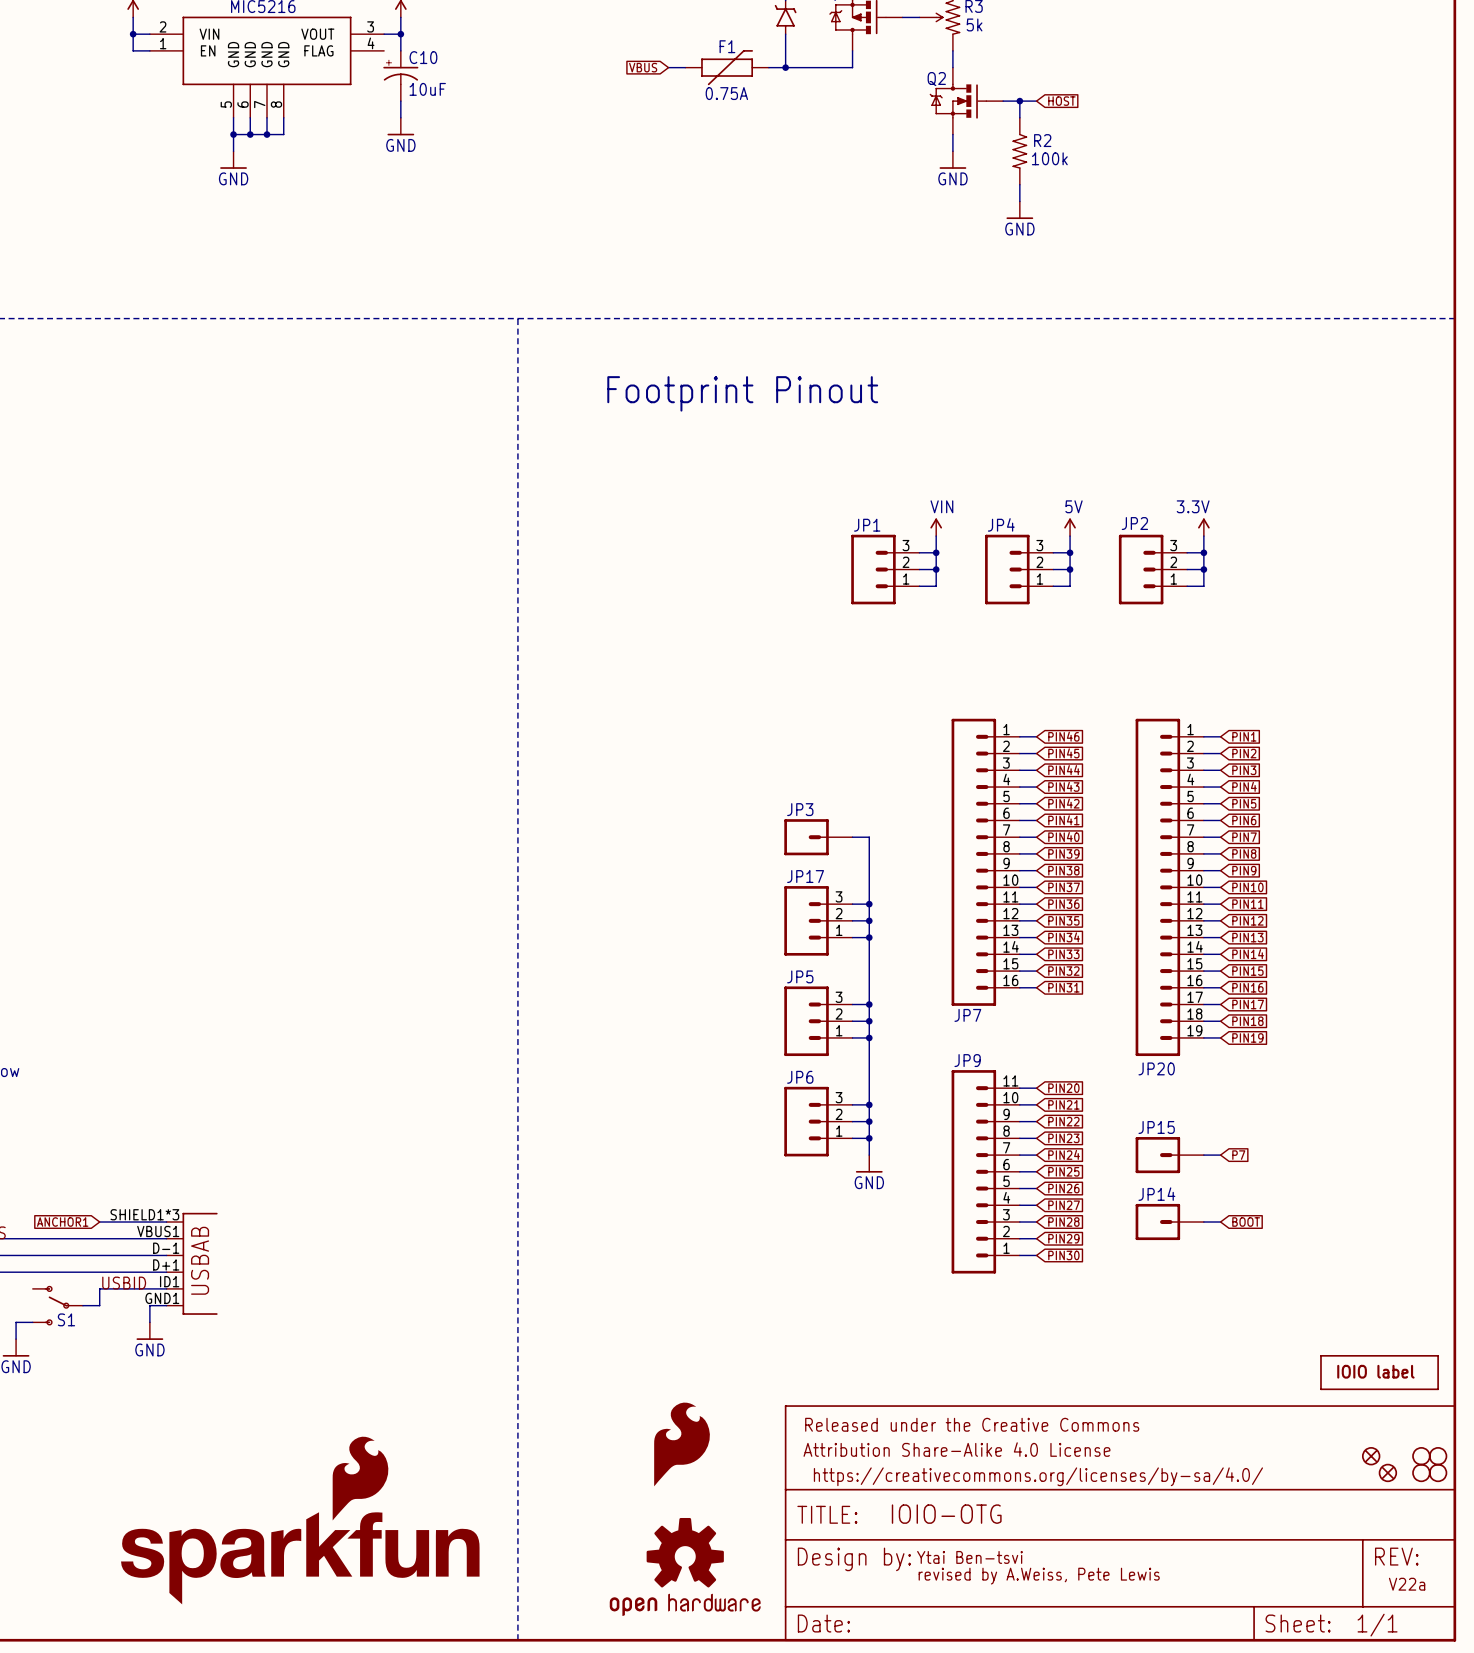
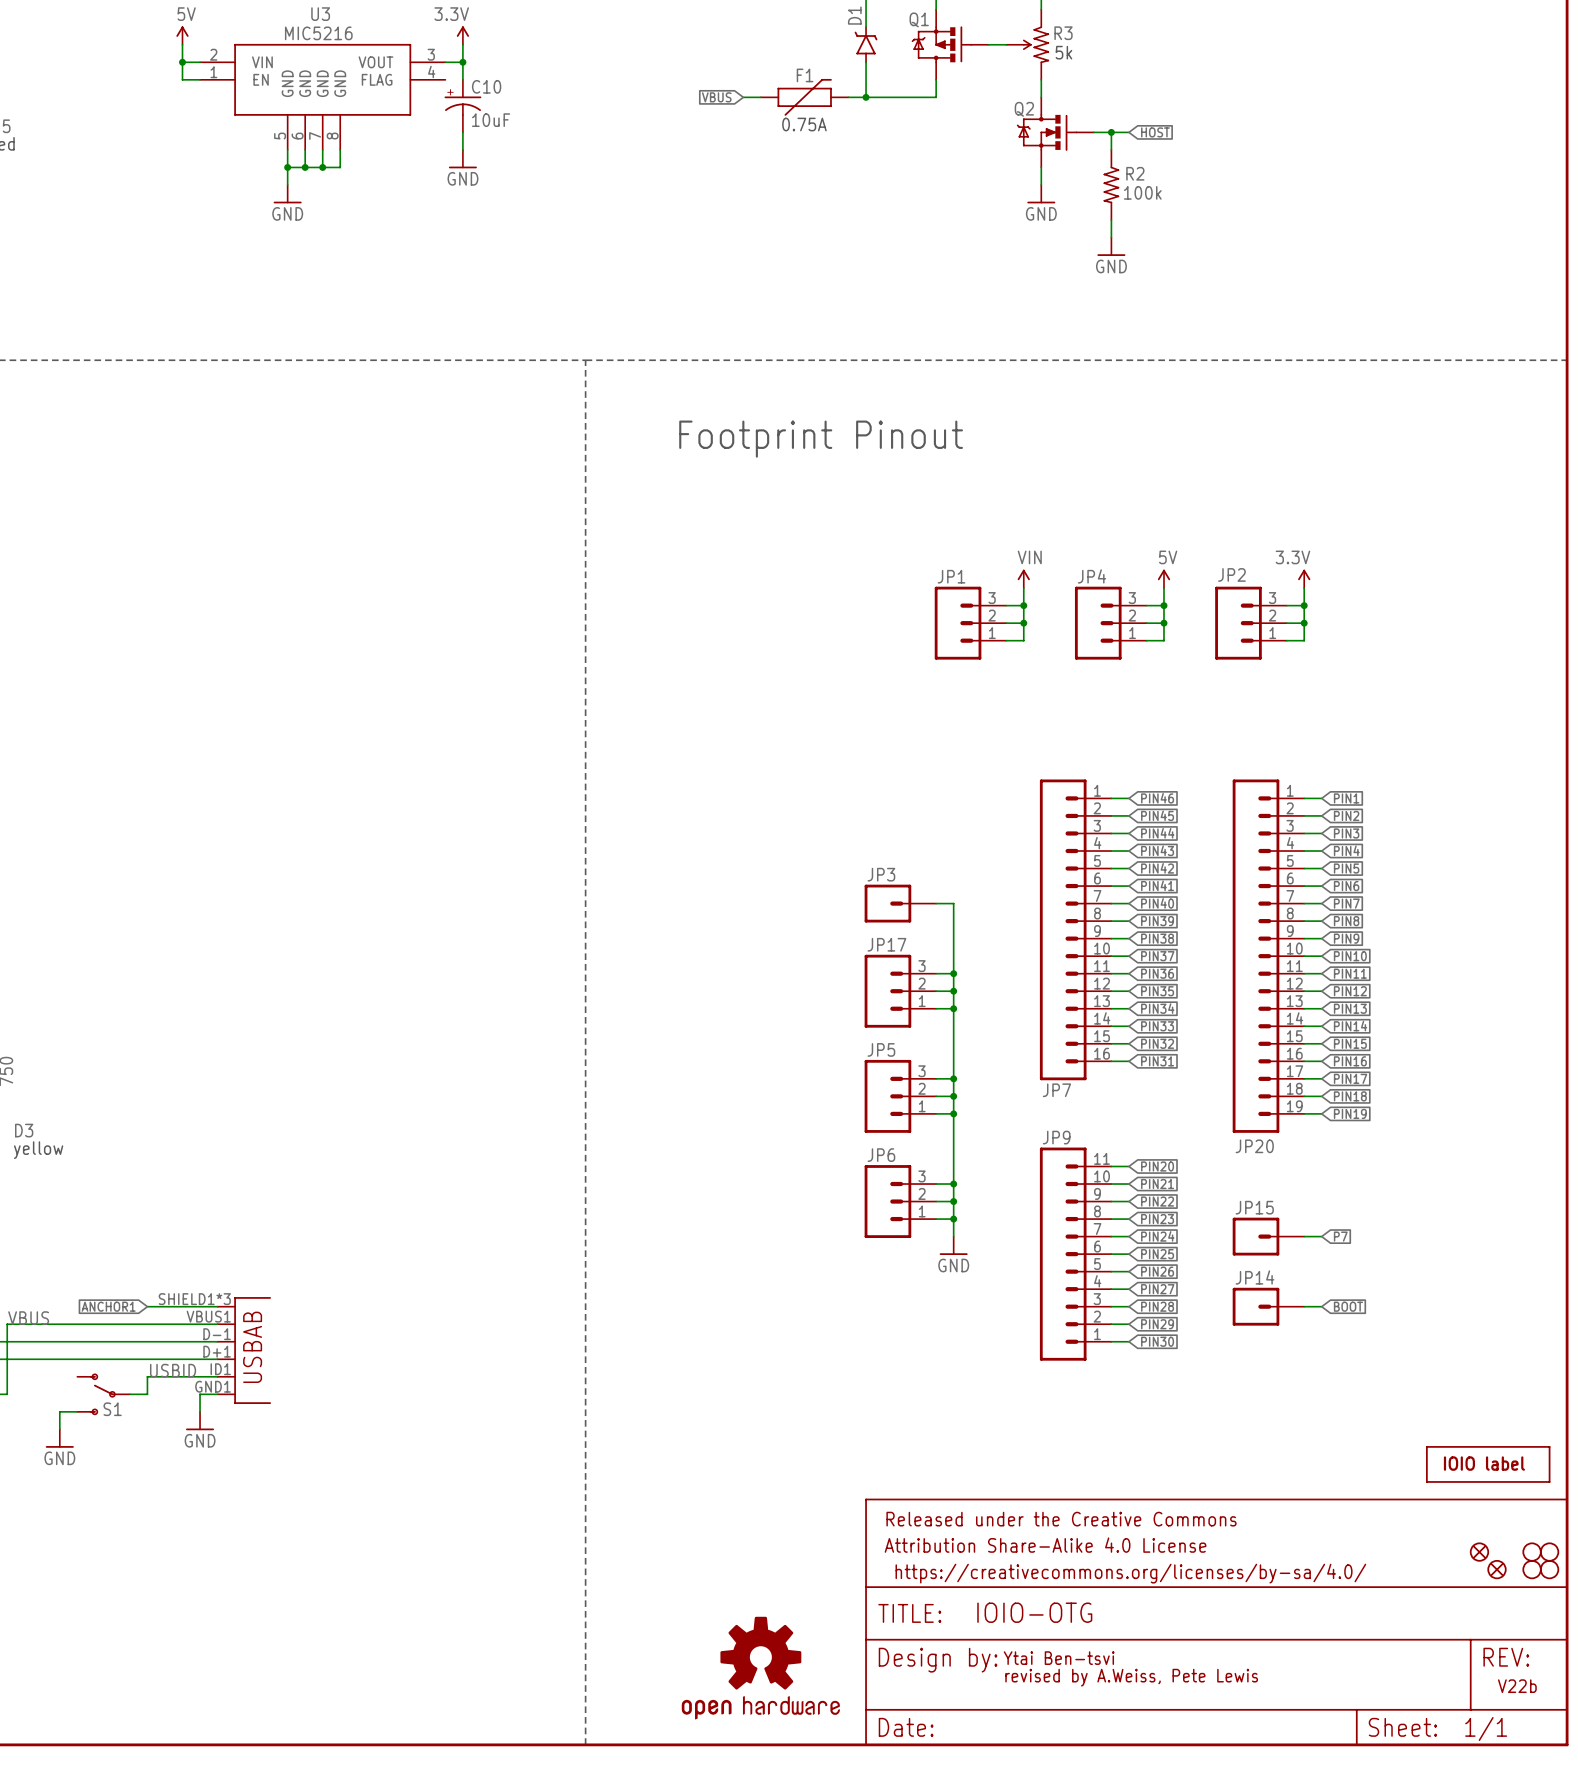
part: (682, 1444) -> none
part: (300, 1520) -> none
text: V22a (1407, 1584) -> V22b (1517, 1686)

